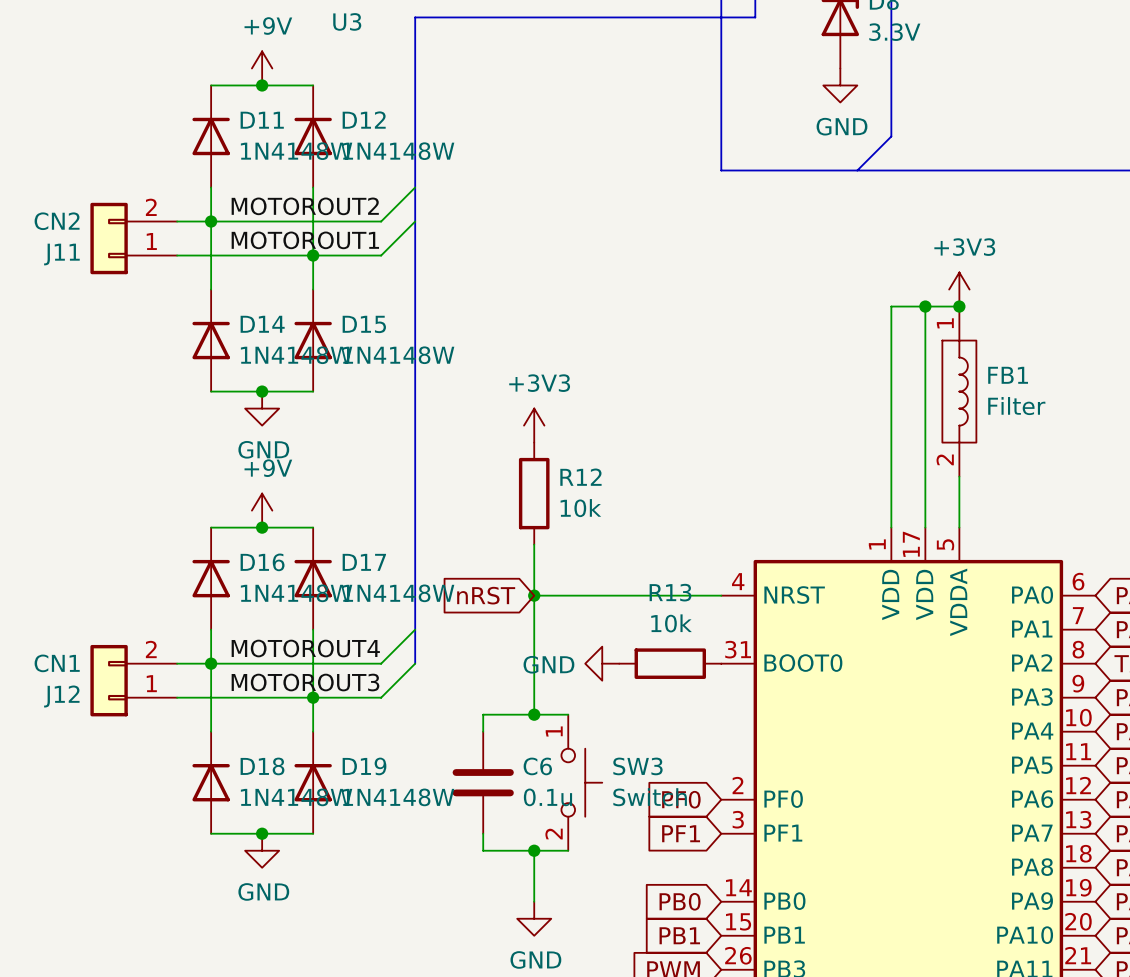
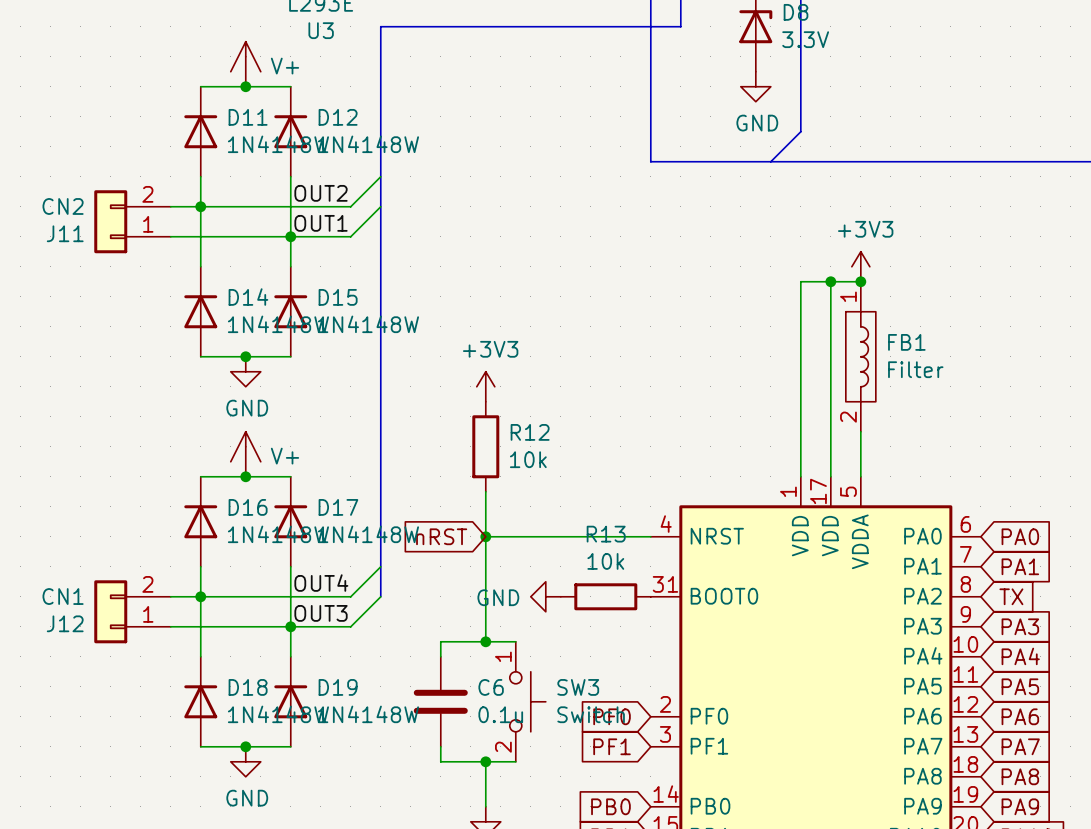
power symbol: +9V (262, 68) -> V+ (245, 64)
label: MOTOROUT2 (305, 206) -> OUT2 (321, 193)
label: MOTOROUT1 (305, 240) -> OUT1 (321, 223)
power symbol: +9V (262, 510) -> V+ (245, 454)
label: MOTOROUT4 (305, 648) -> OUT4 (321, 583)
label: MOTOROUT3 (305, 682) -> OUT3 (321, 613)

